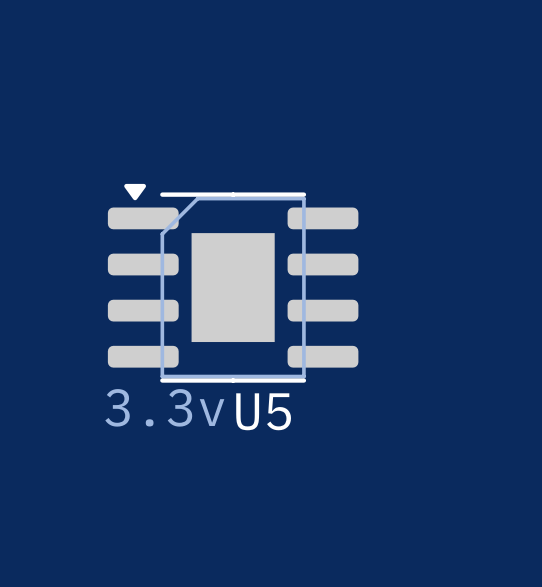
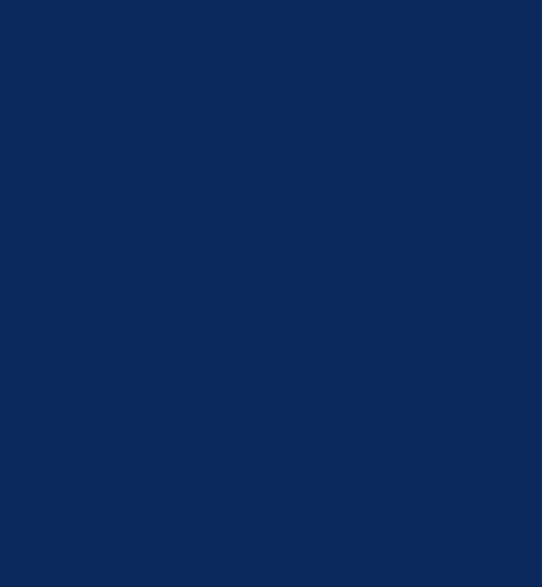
U5: 3.3v (233, 283) -> none

